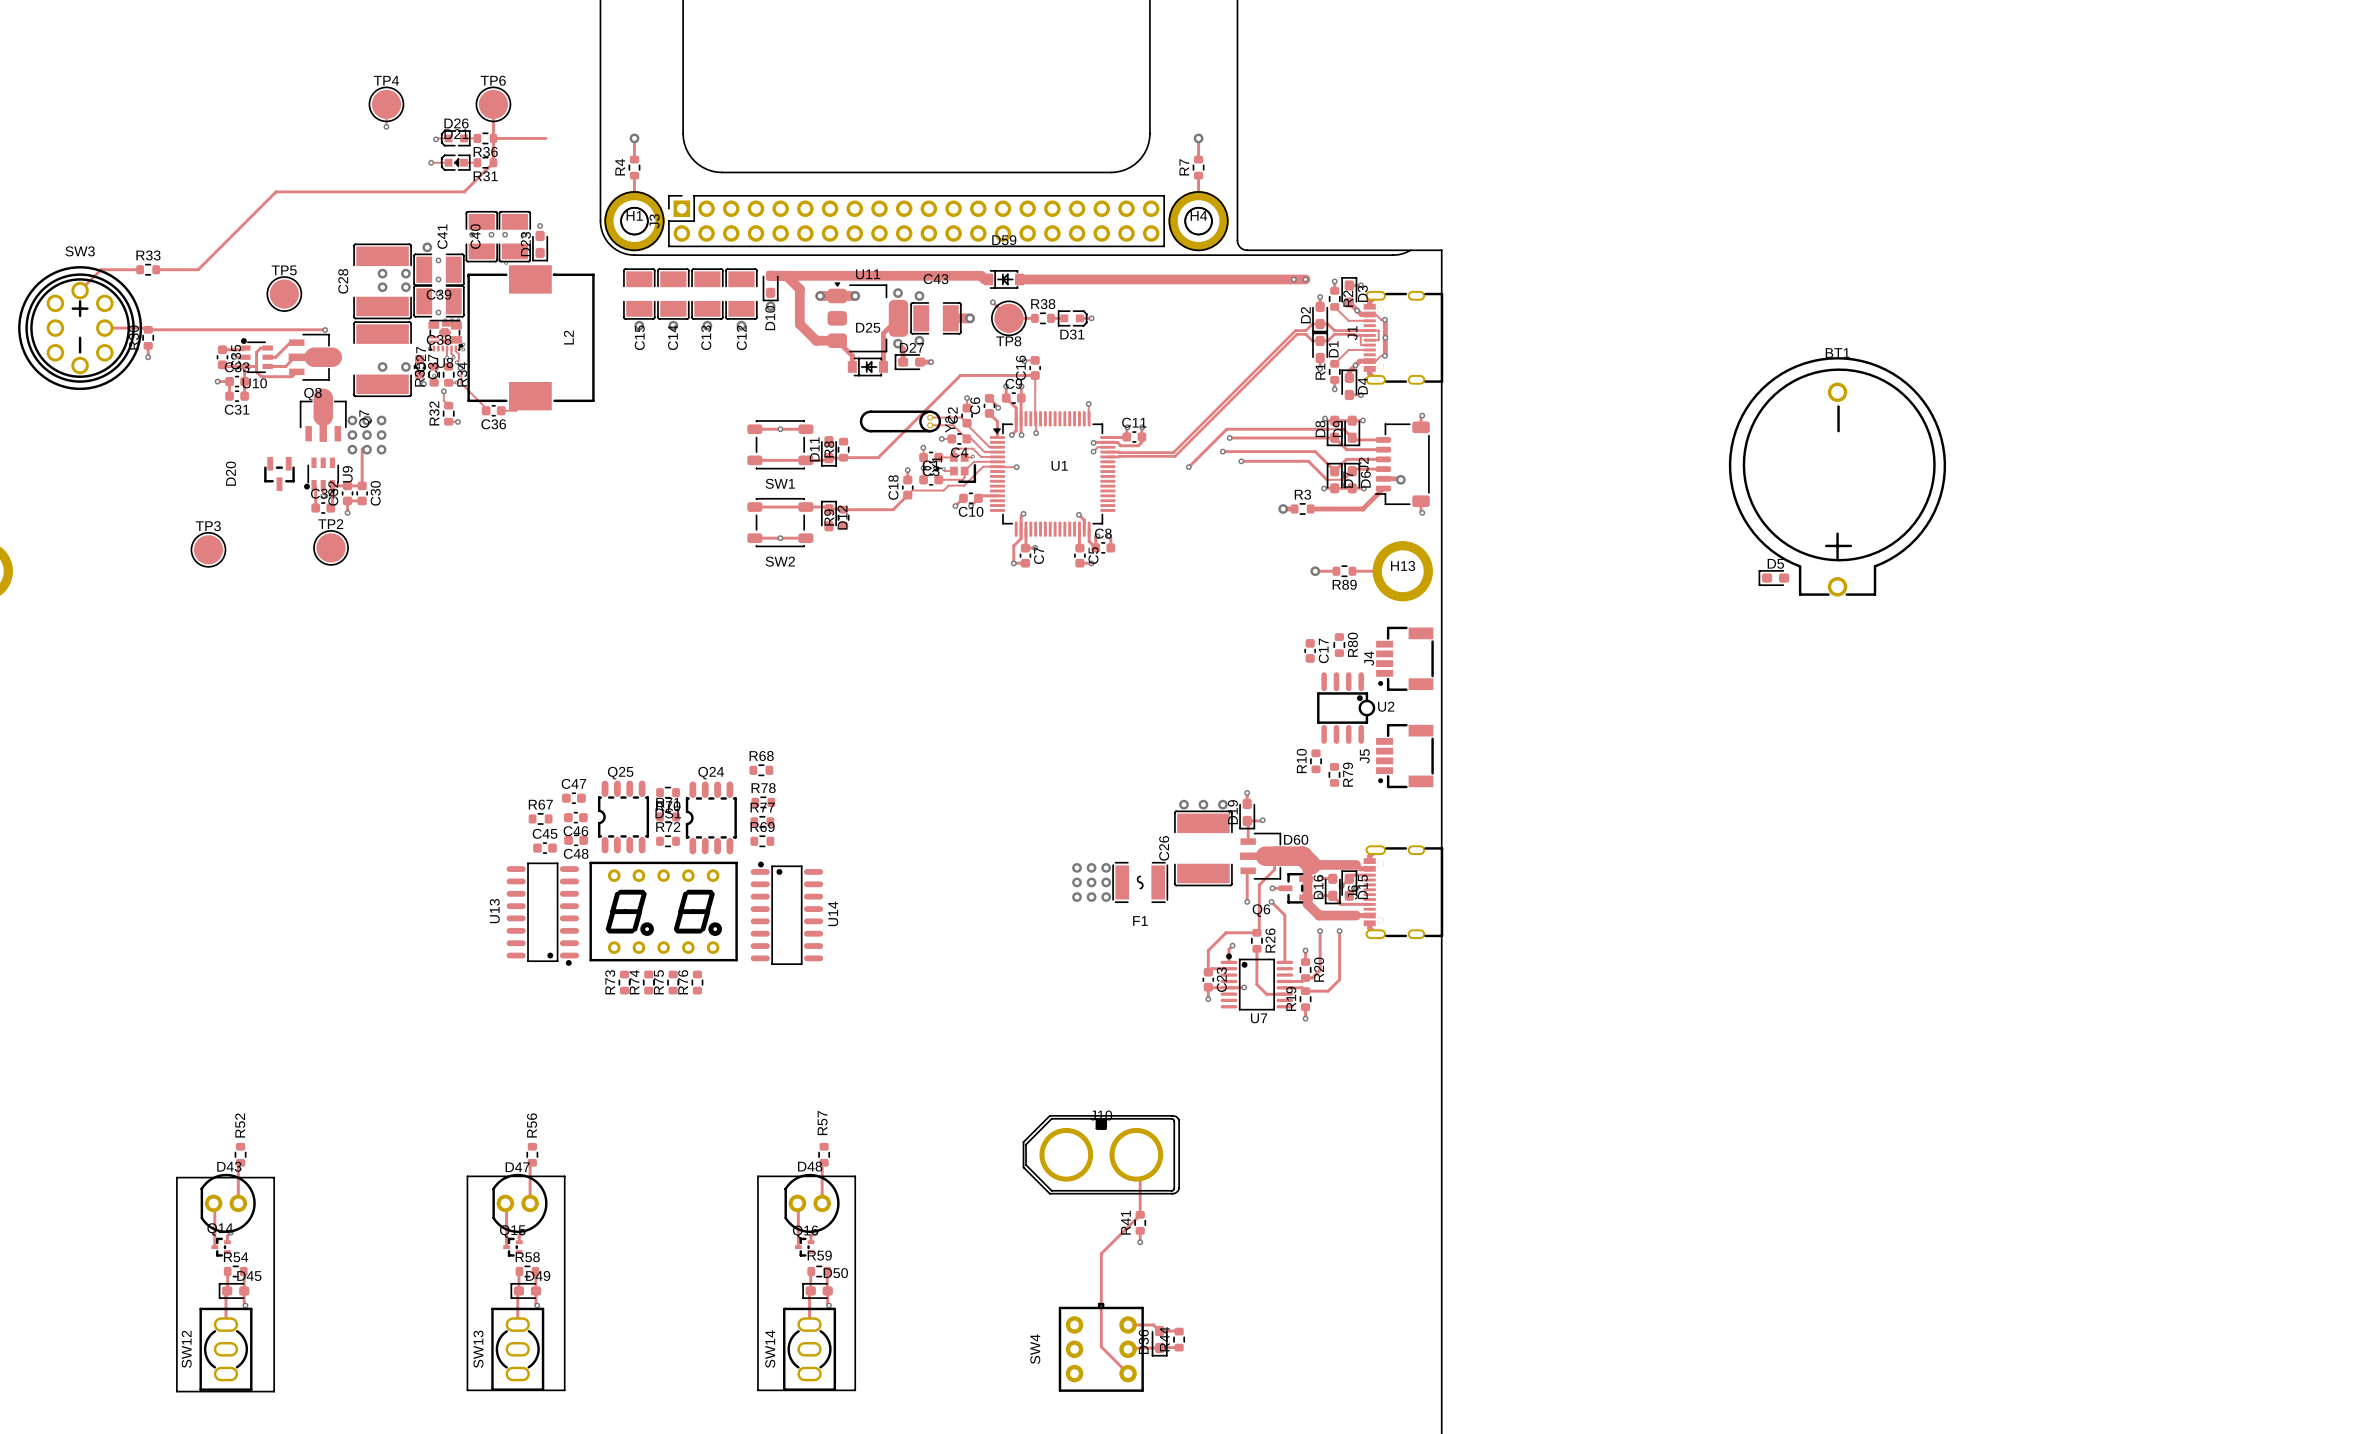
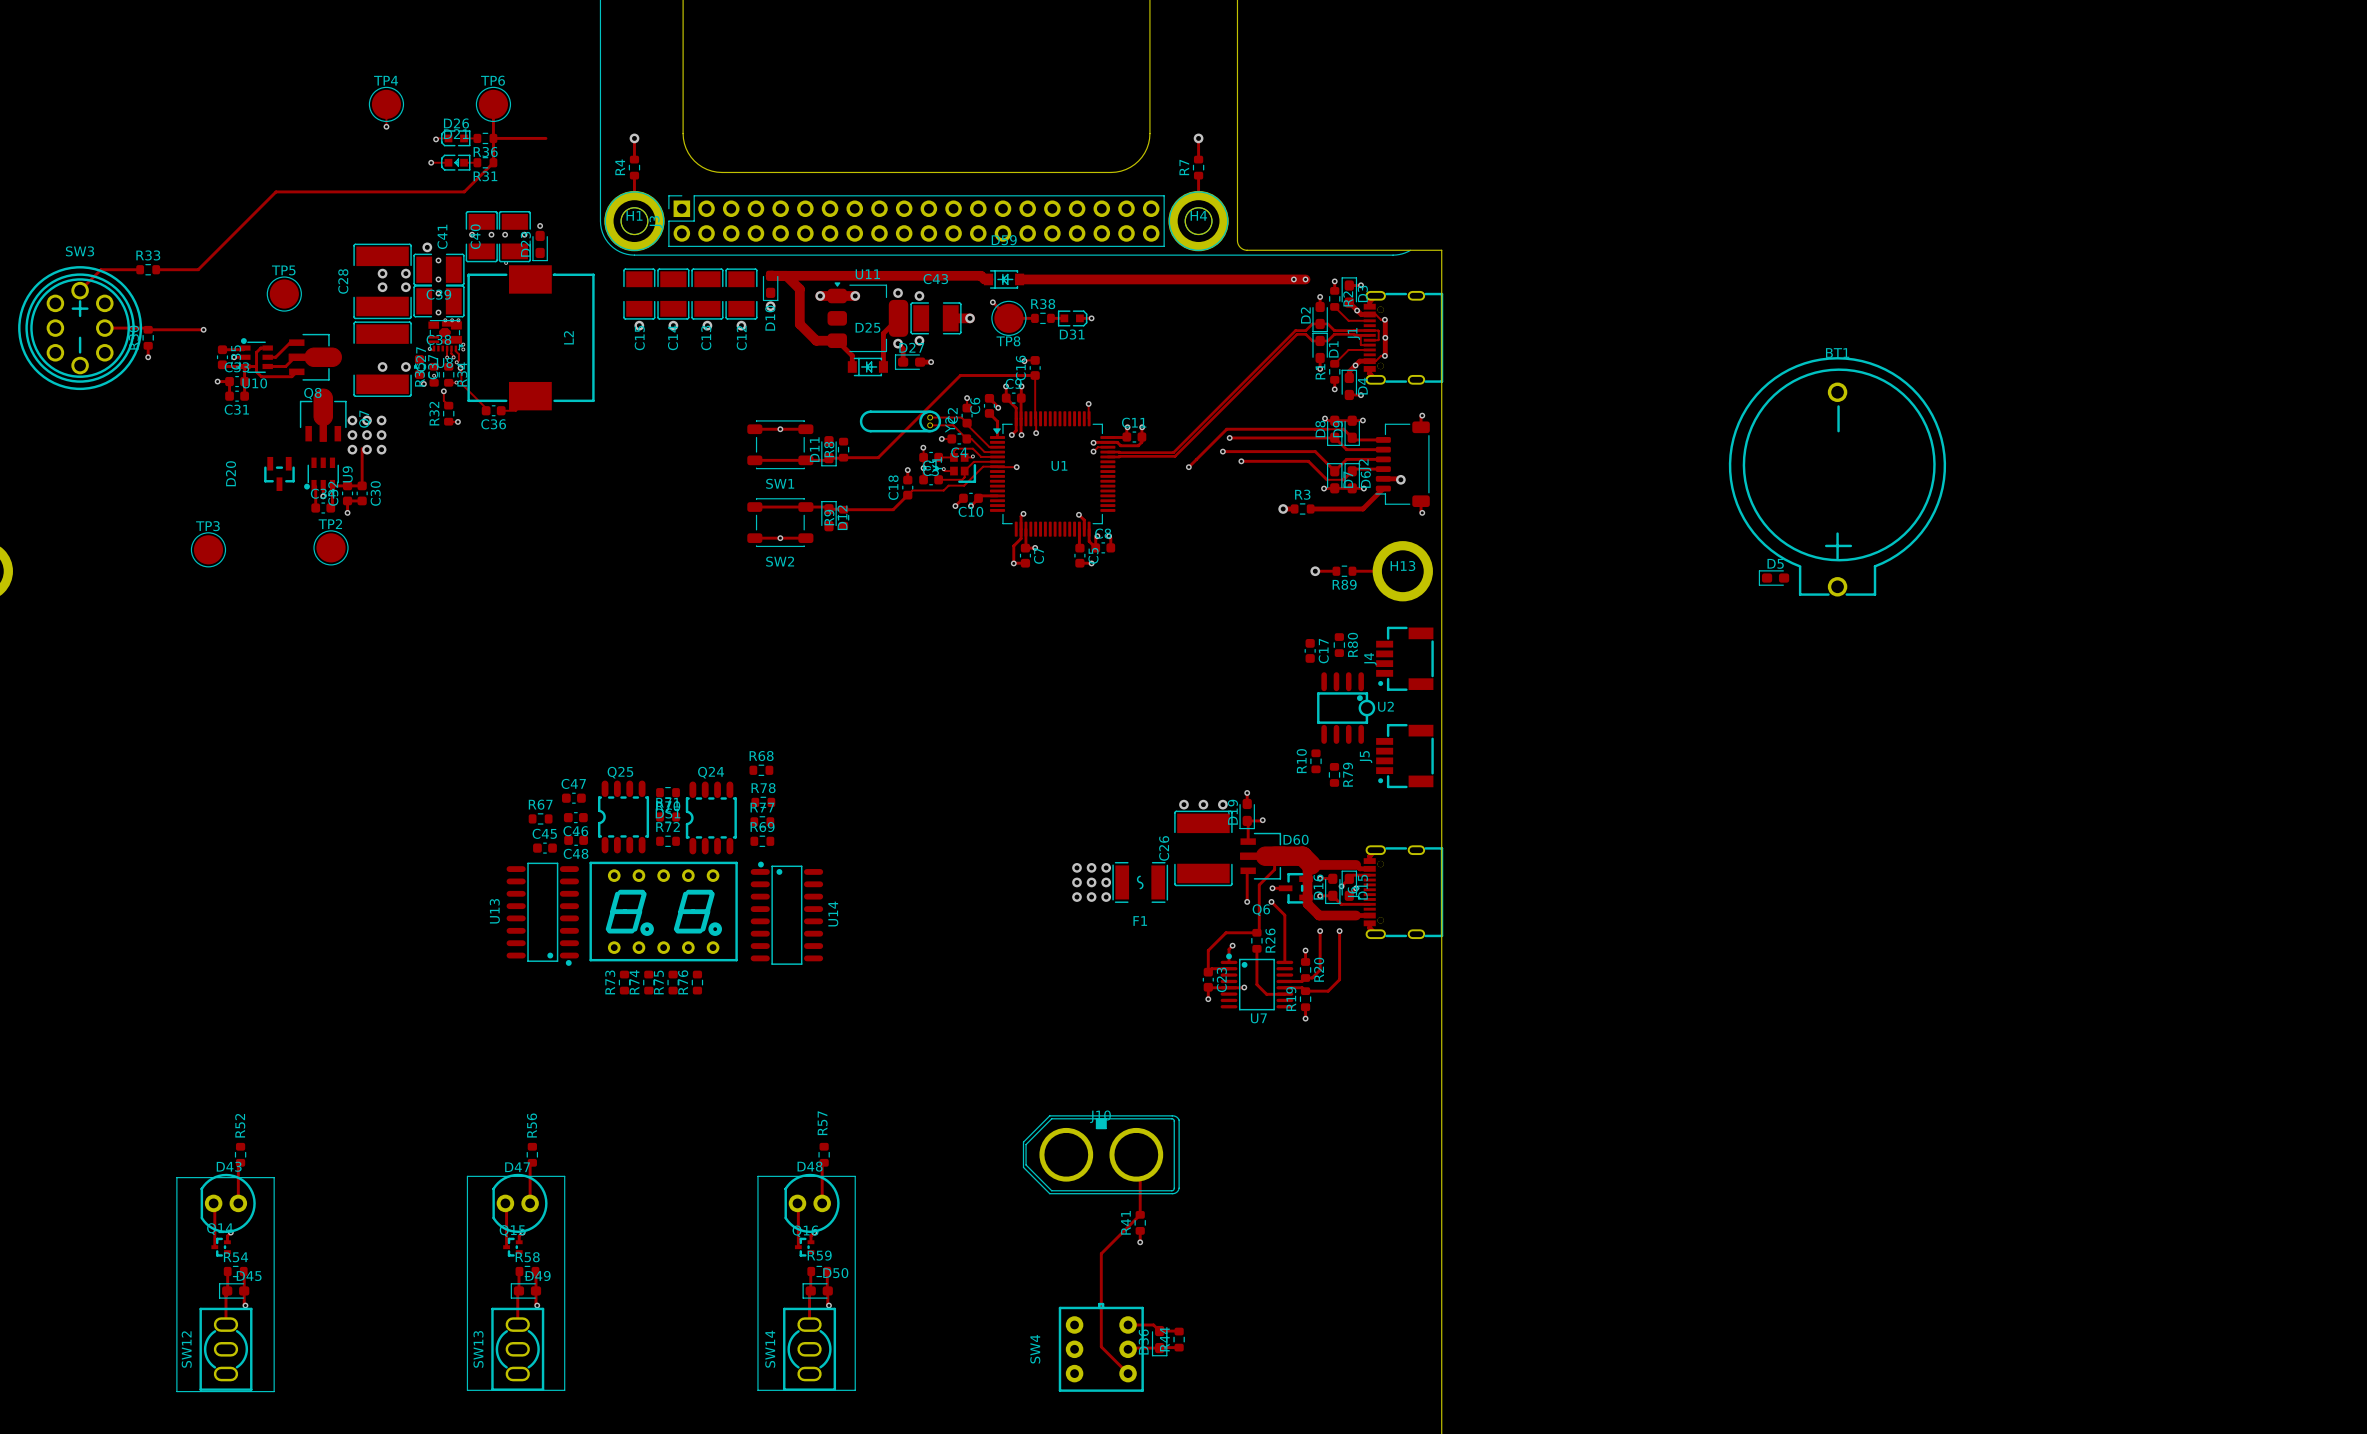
track: (203, 329) (325, 330) -> none
via: none -> (203, 329)
via: (325, 330) -> none

